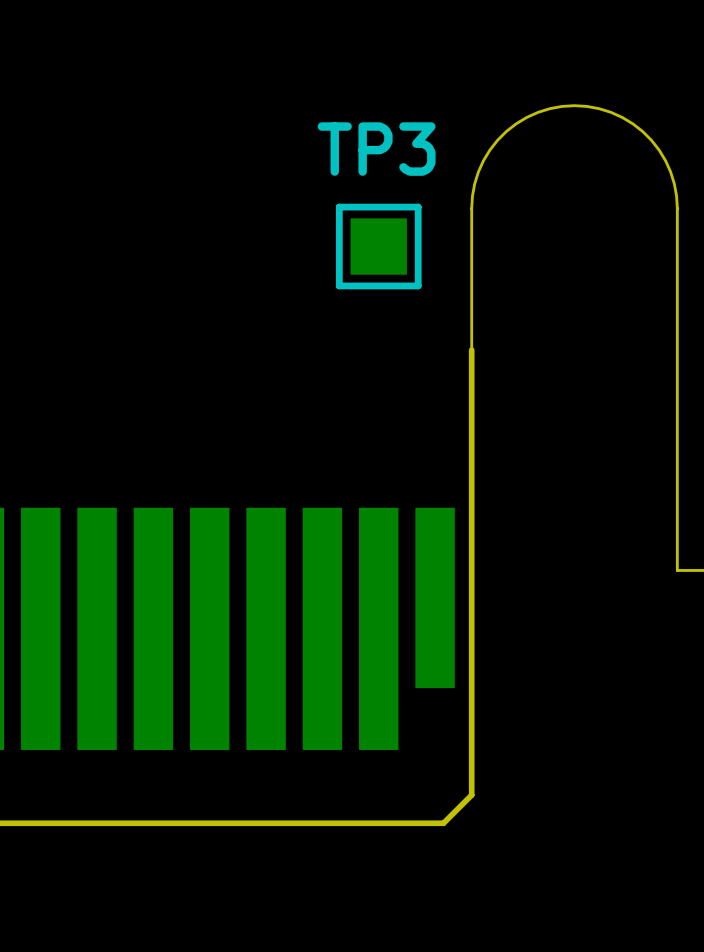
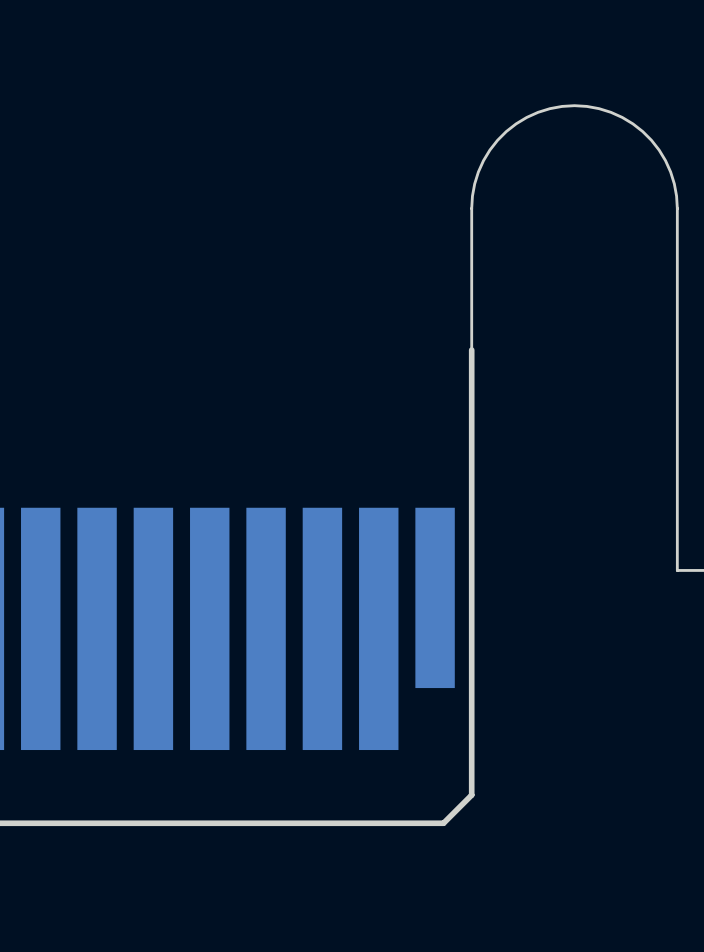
TP3: (378, 246) -> none

